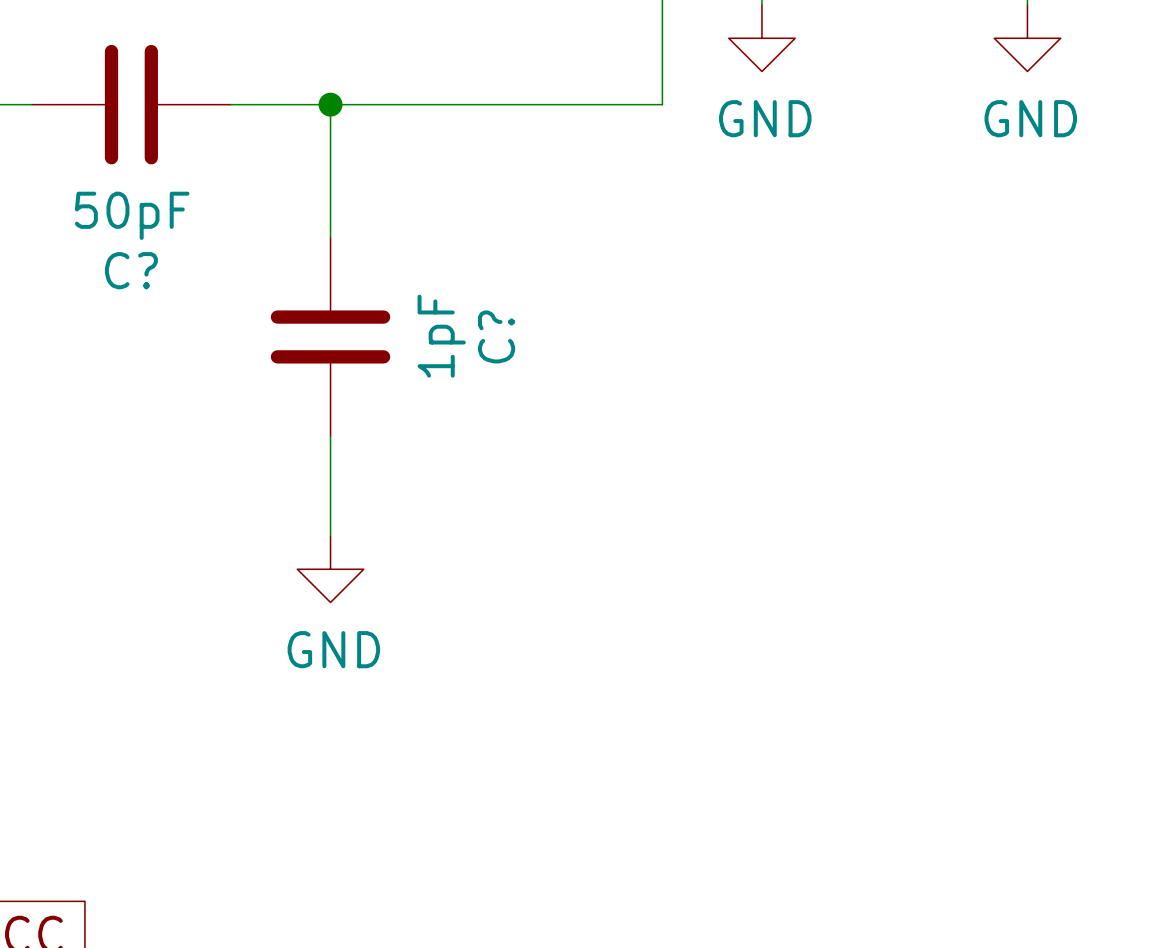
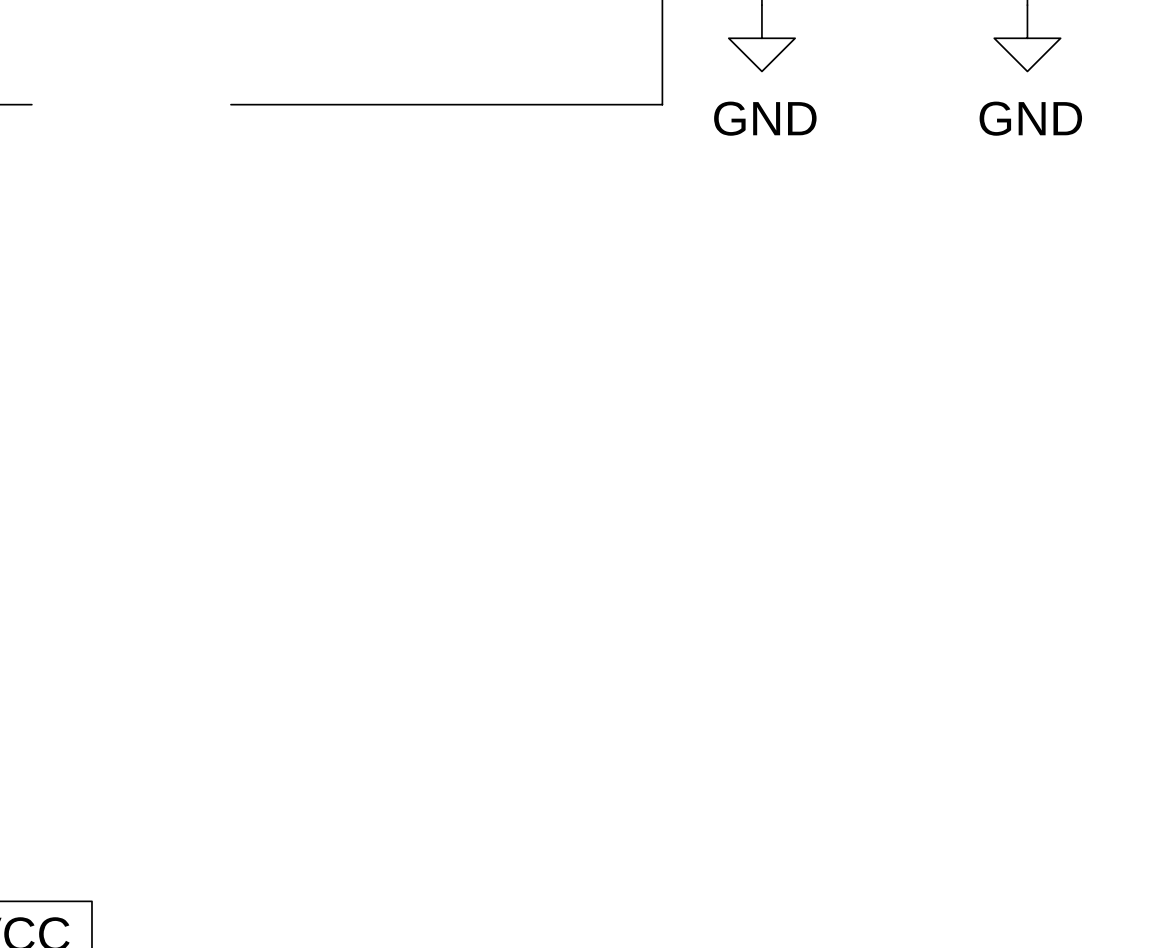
C?: 50pF (131, 104) -> none
wire: (330, 104) (330, 237) -> none
junction: (330, 104) -> none
C?: 1pF (330, 336) -> none
wire: (330, 436) (330, 536) -> none
power symbol: GND (330, 569) -> none

